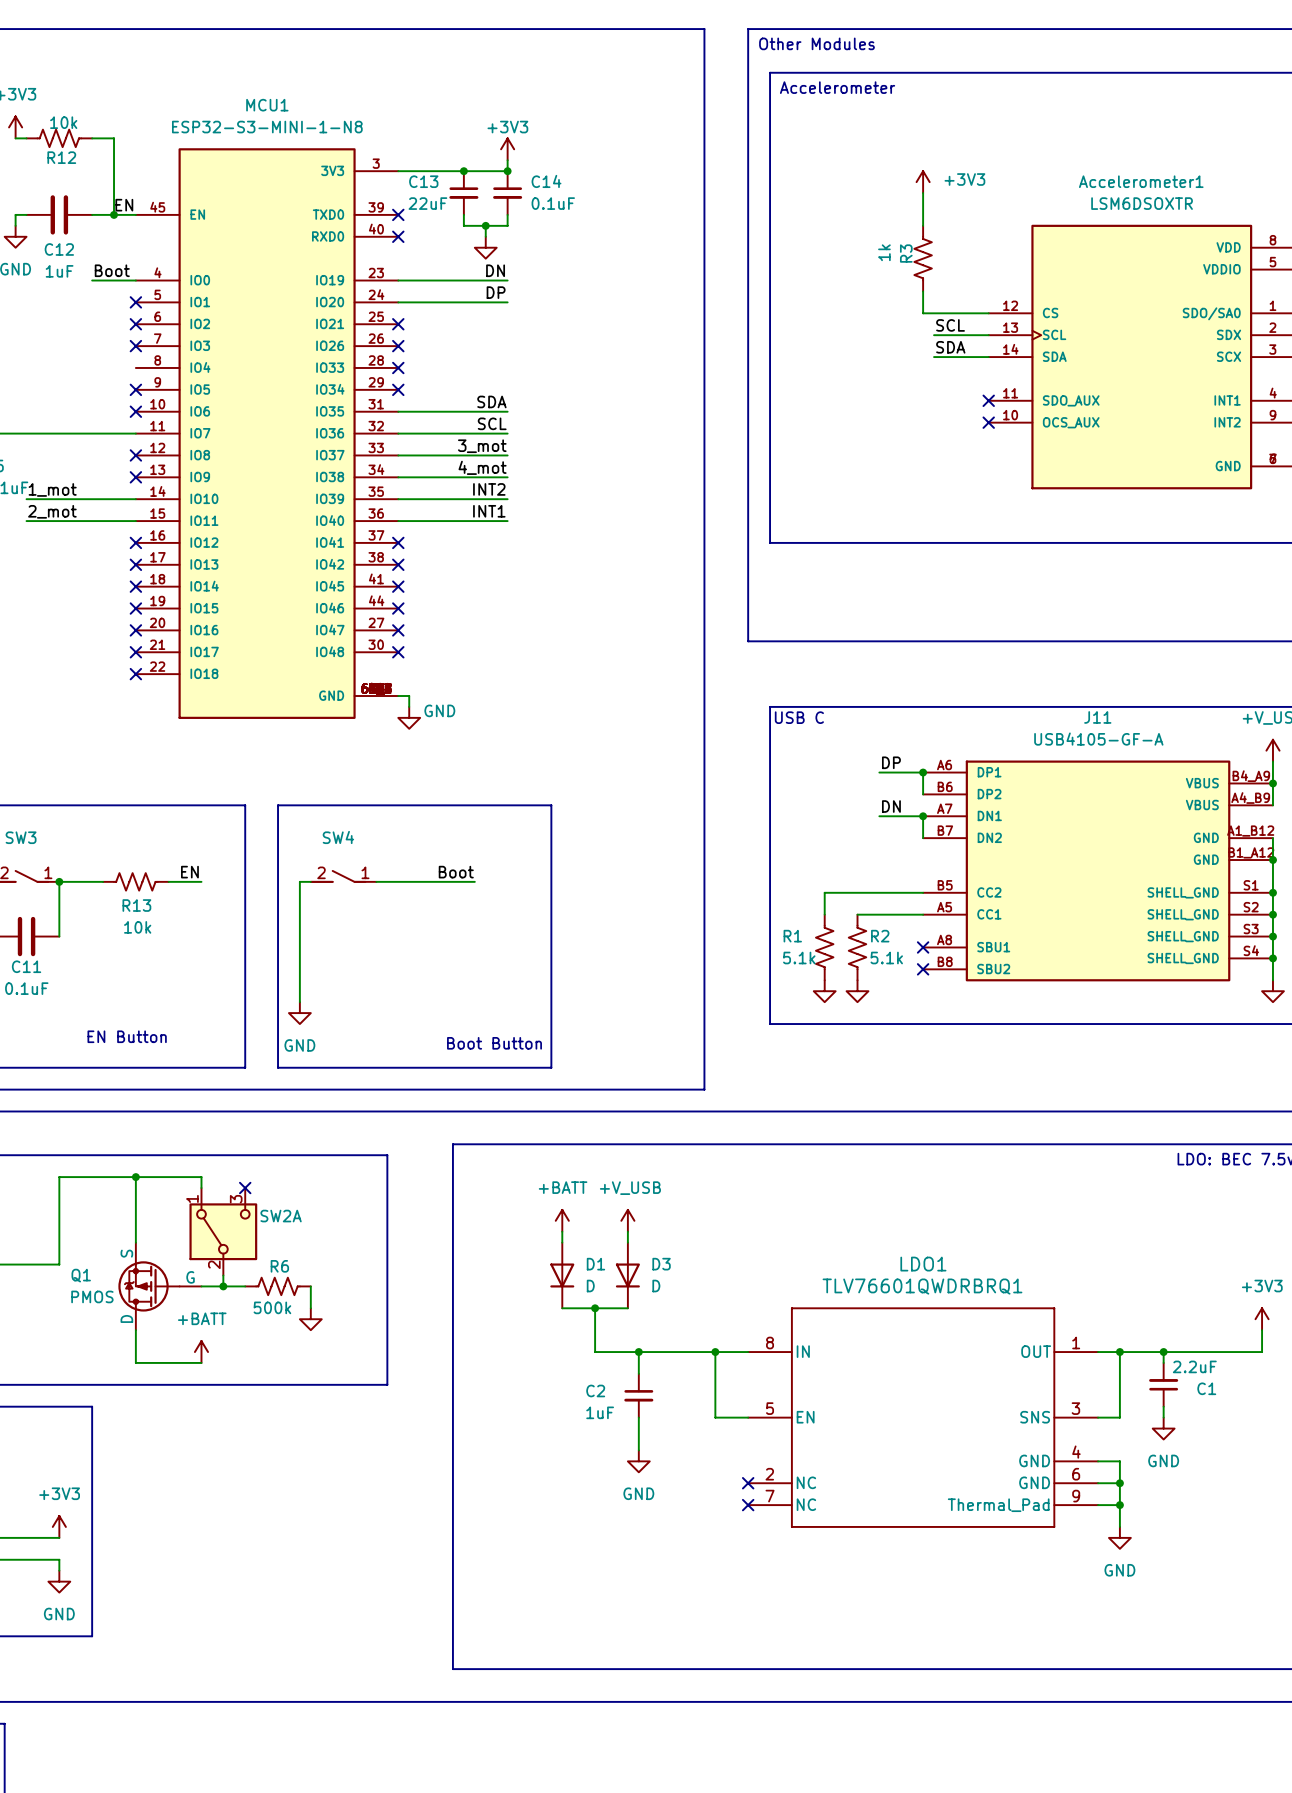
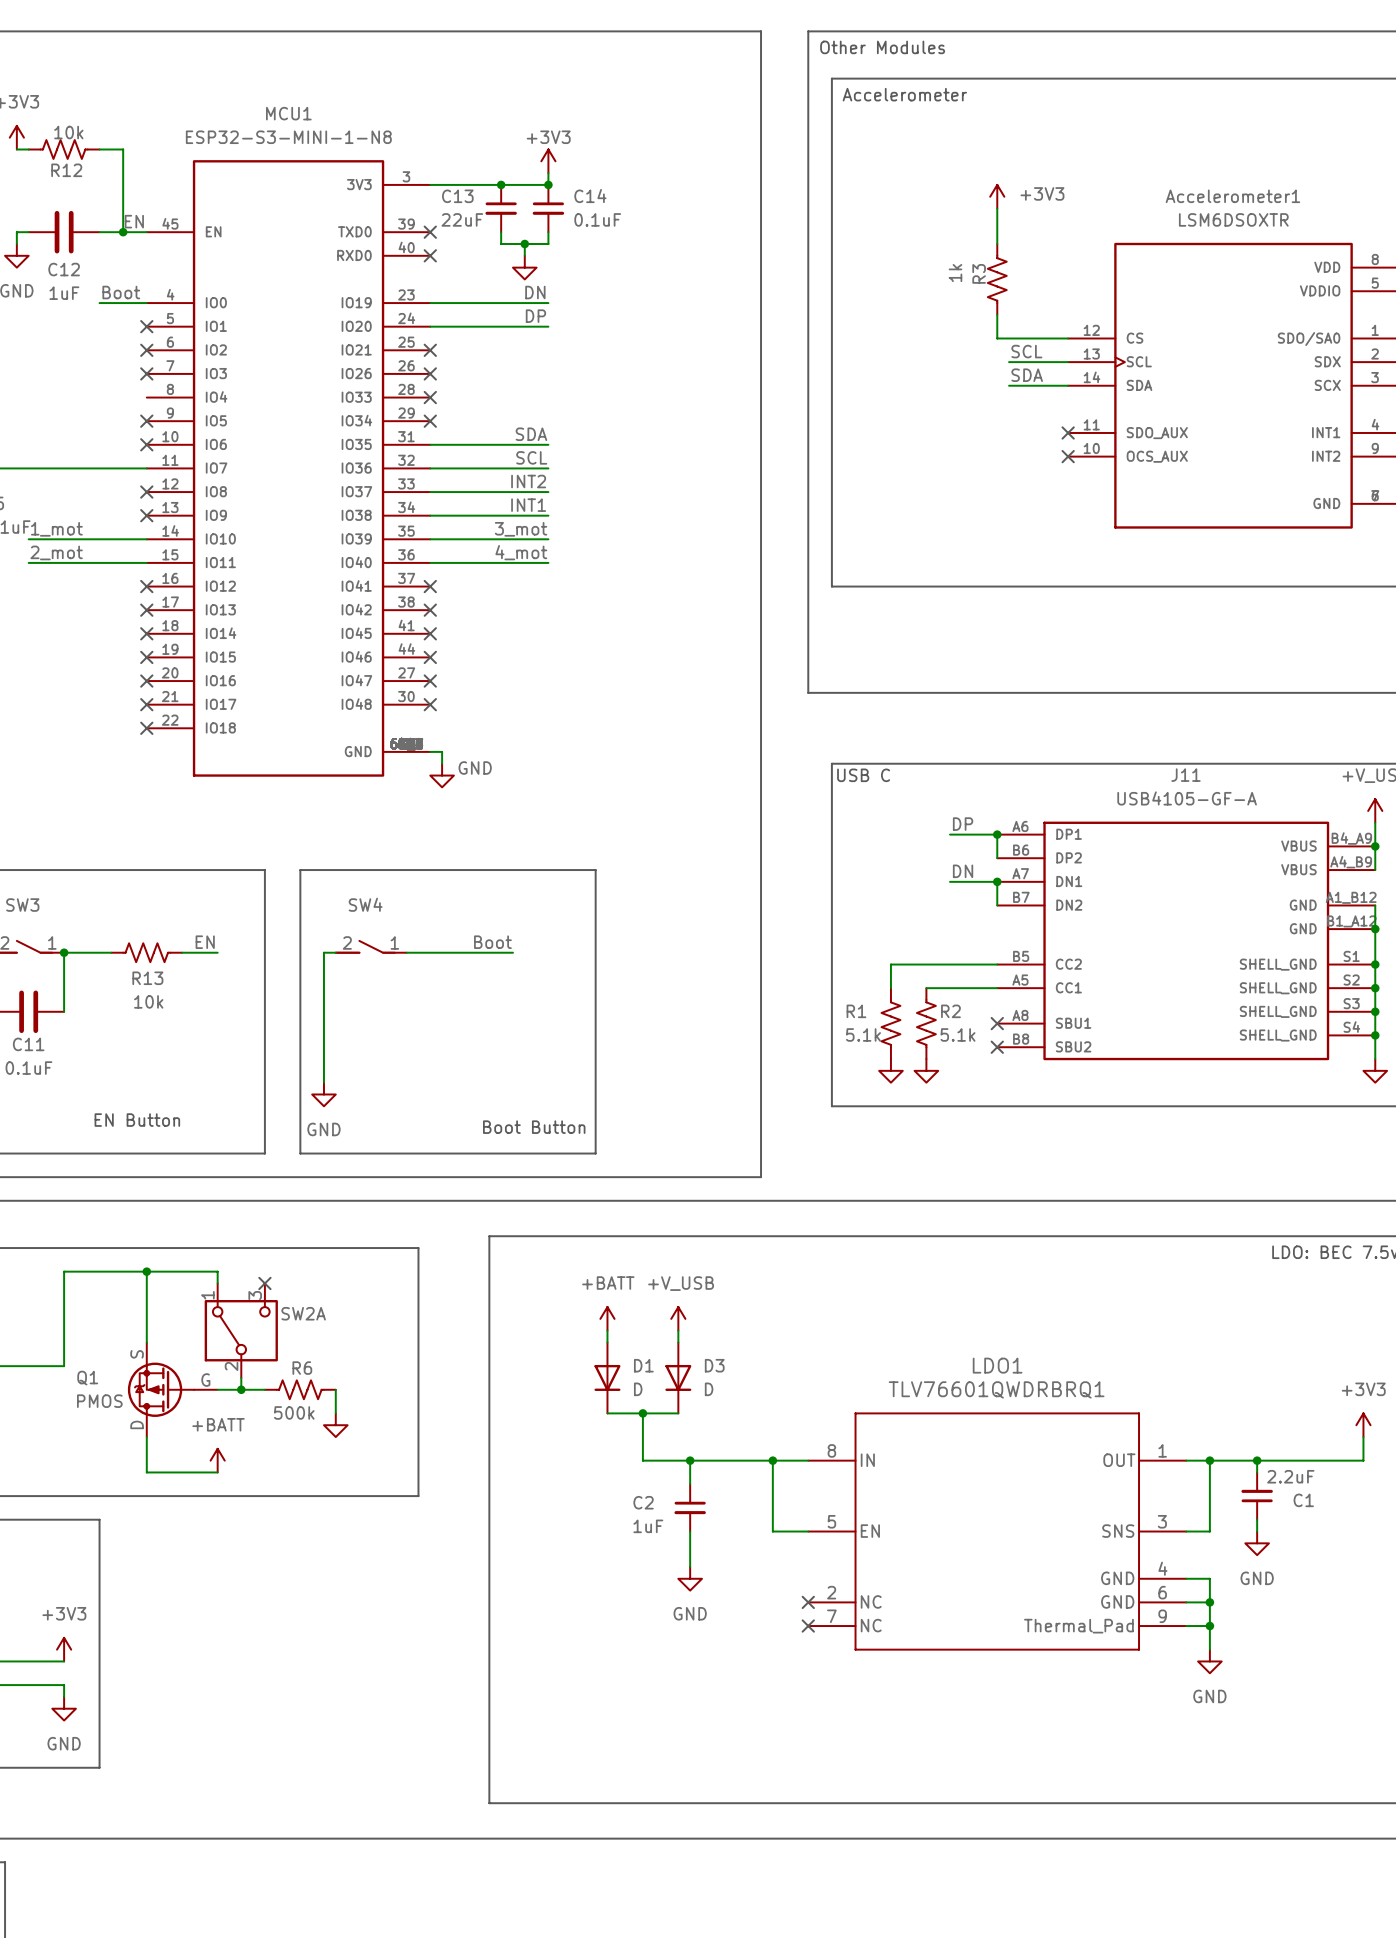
label: 3_mot (482, 446) -> INT2 (528, 481)
label: 4_mot (482, 467) -> INT1 (528, 505)
label: INT2 (489, 489) -> 3_mot (521, 529)
label: INT1 (489, 511) -> 4_mot (521, 552)

